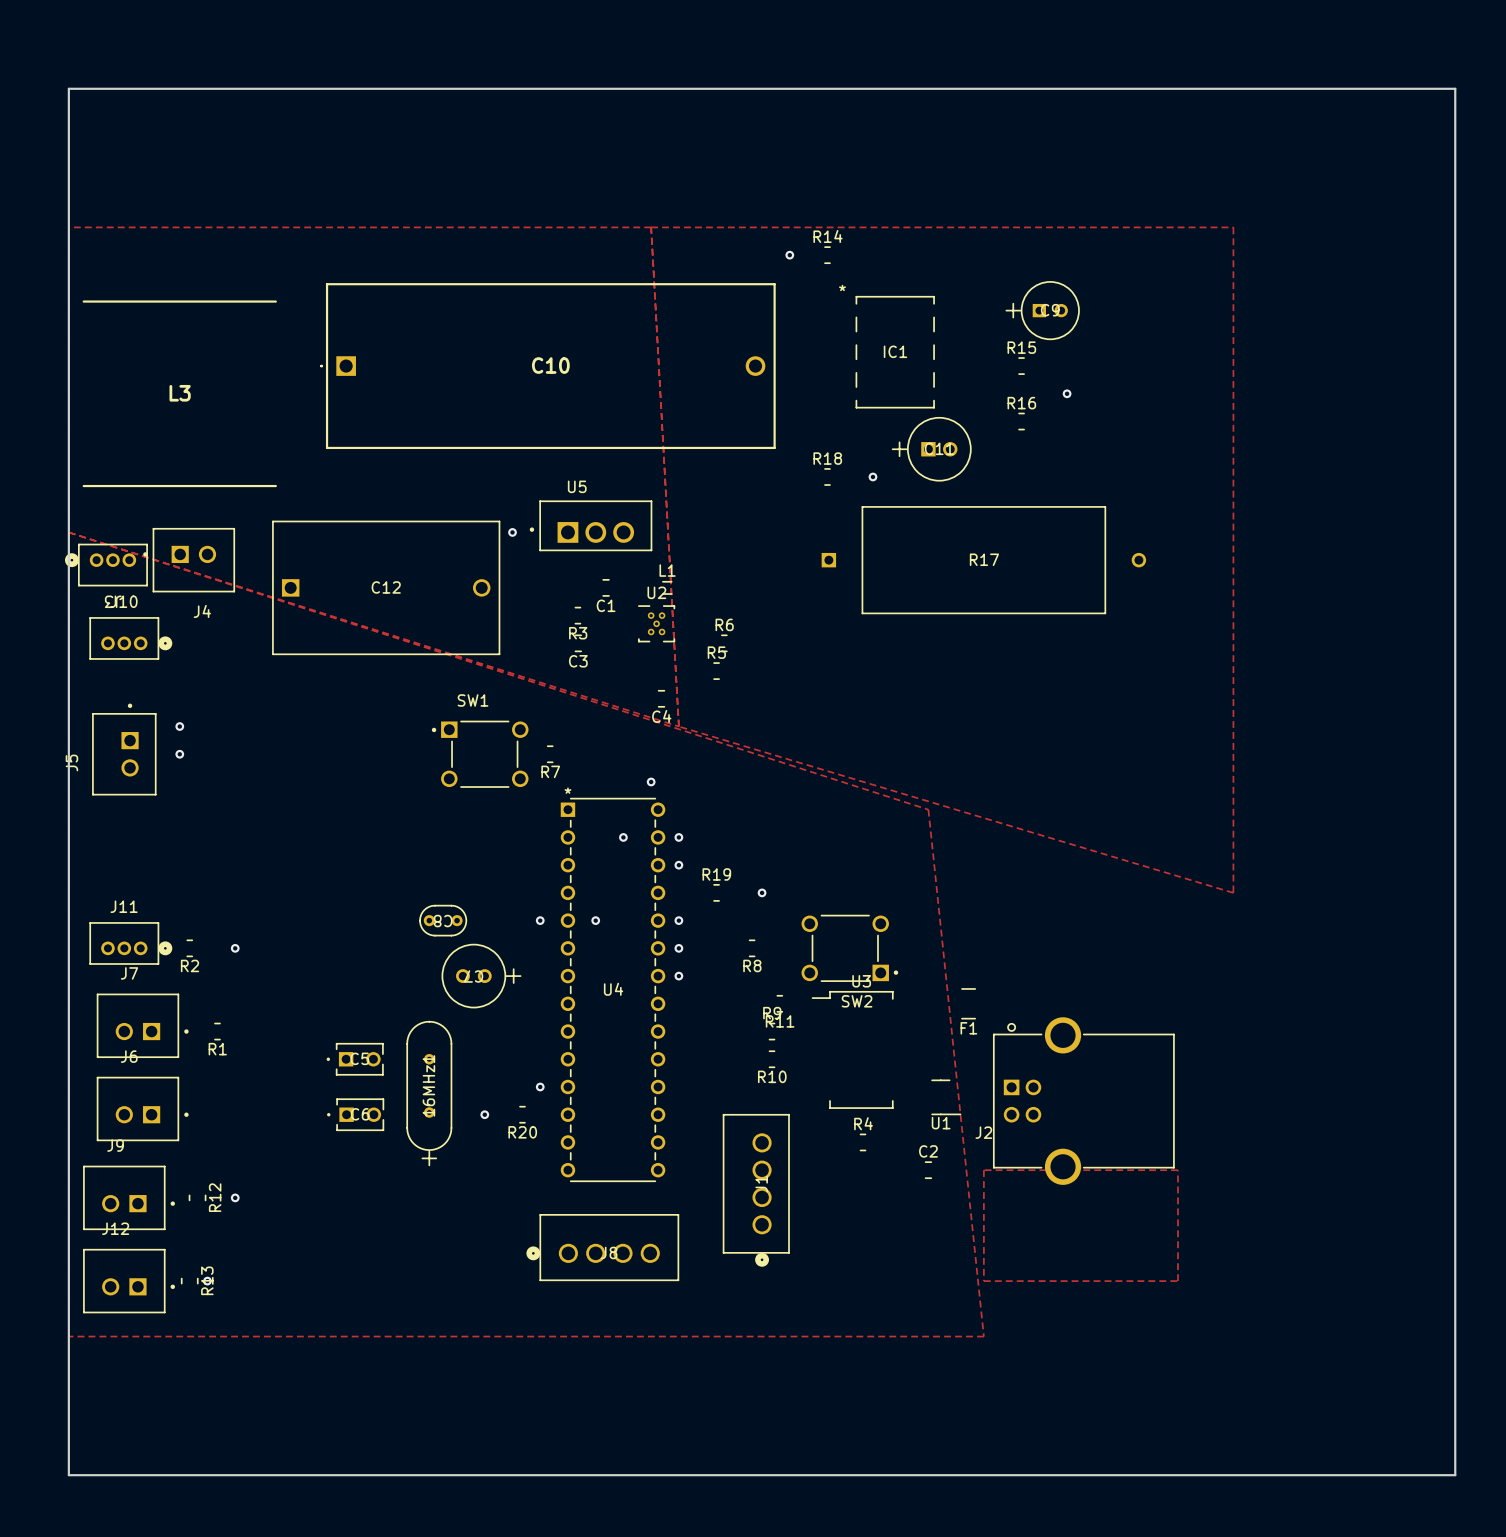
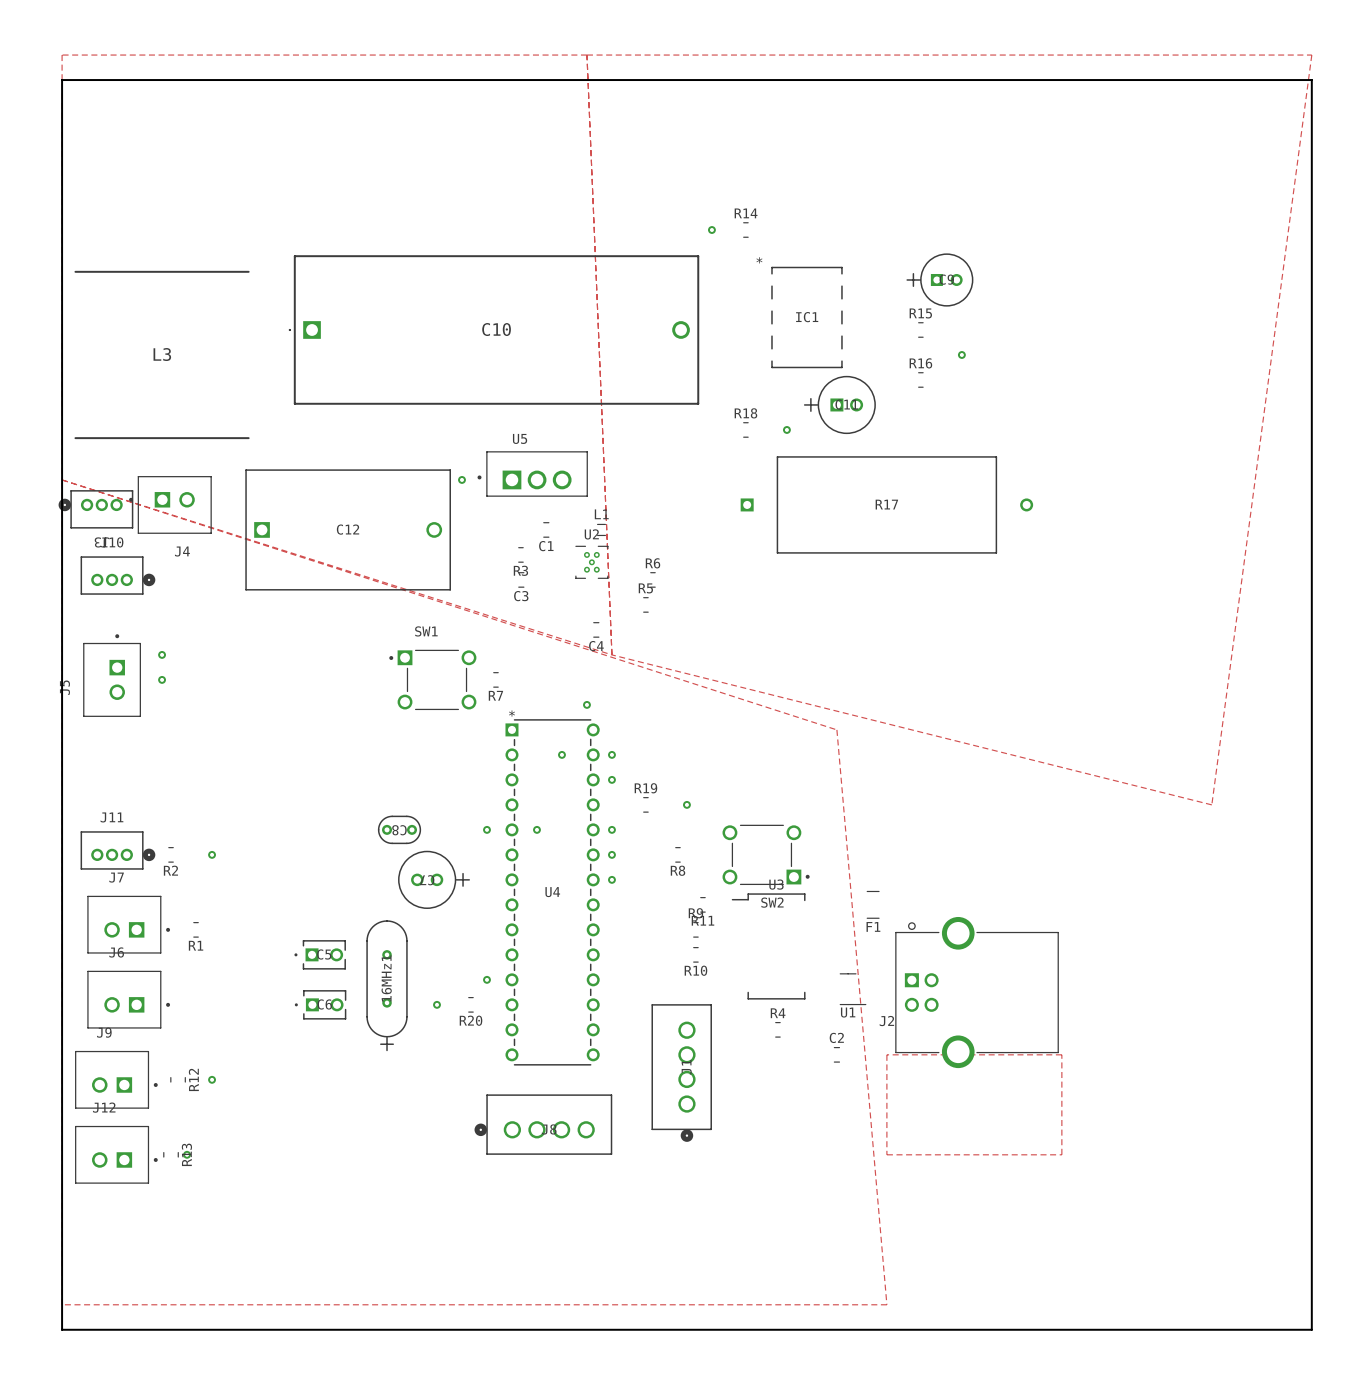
zone outline: (68, 227) (1233, 227) (1233, 892) (678, 726) (651, 227) -> (62, 205) (62, 55) (1311, 55) (1211, 804) (611, 654) (586, 55)
zone outline: (928, 809) (983, 1336) (68, 1336) -> (836, 729) (886, 1304) (62, 1304) (62, 1204)

